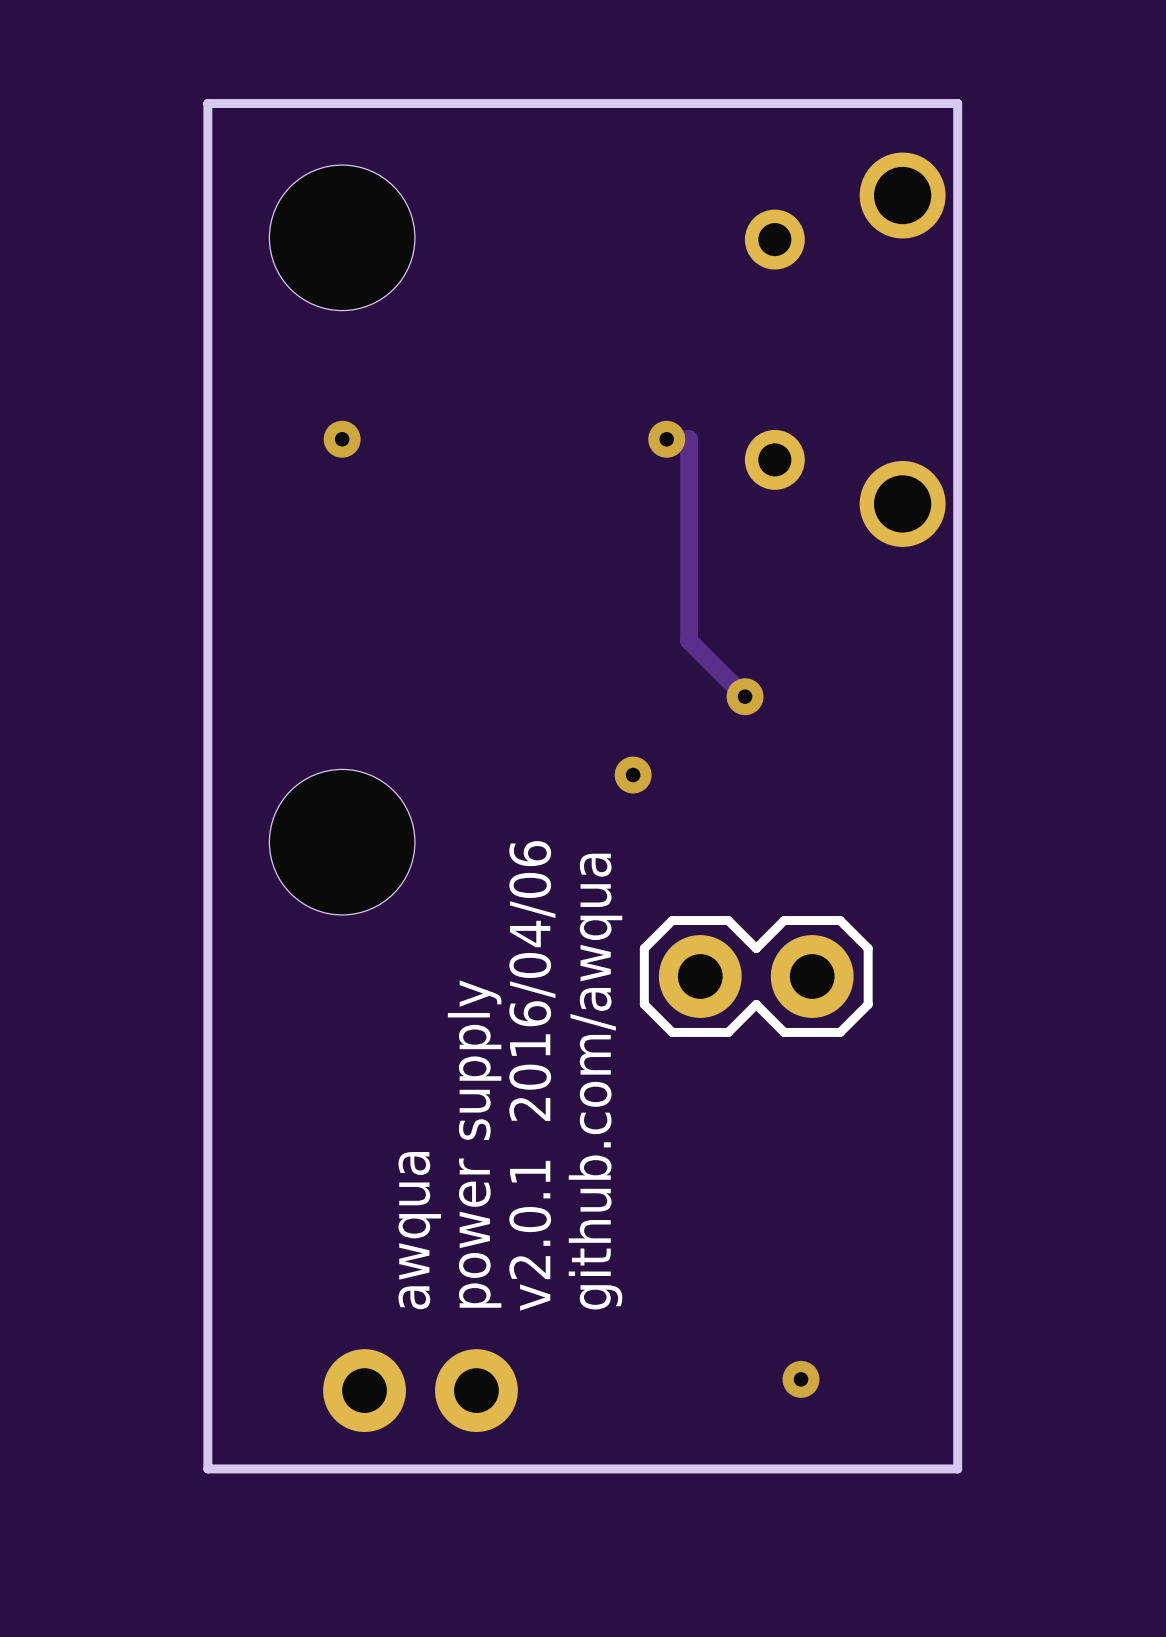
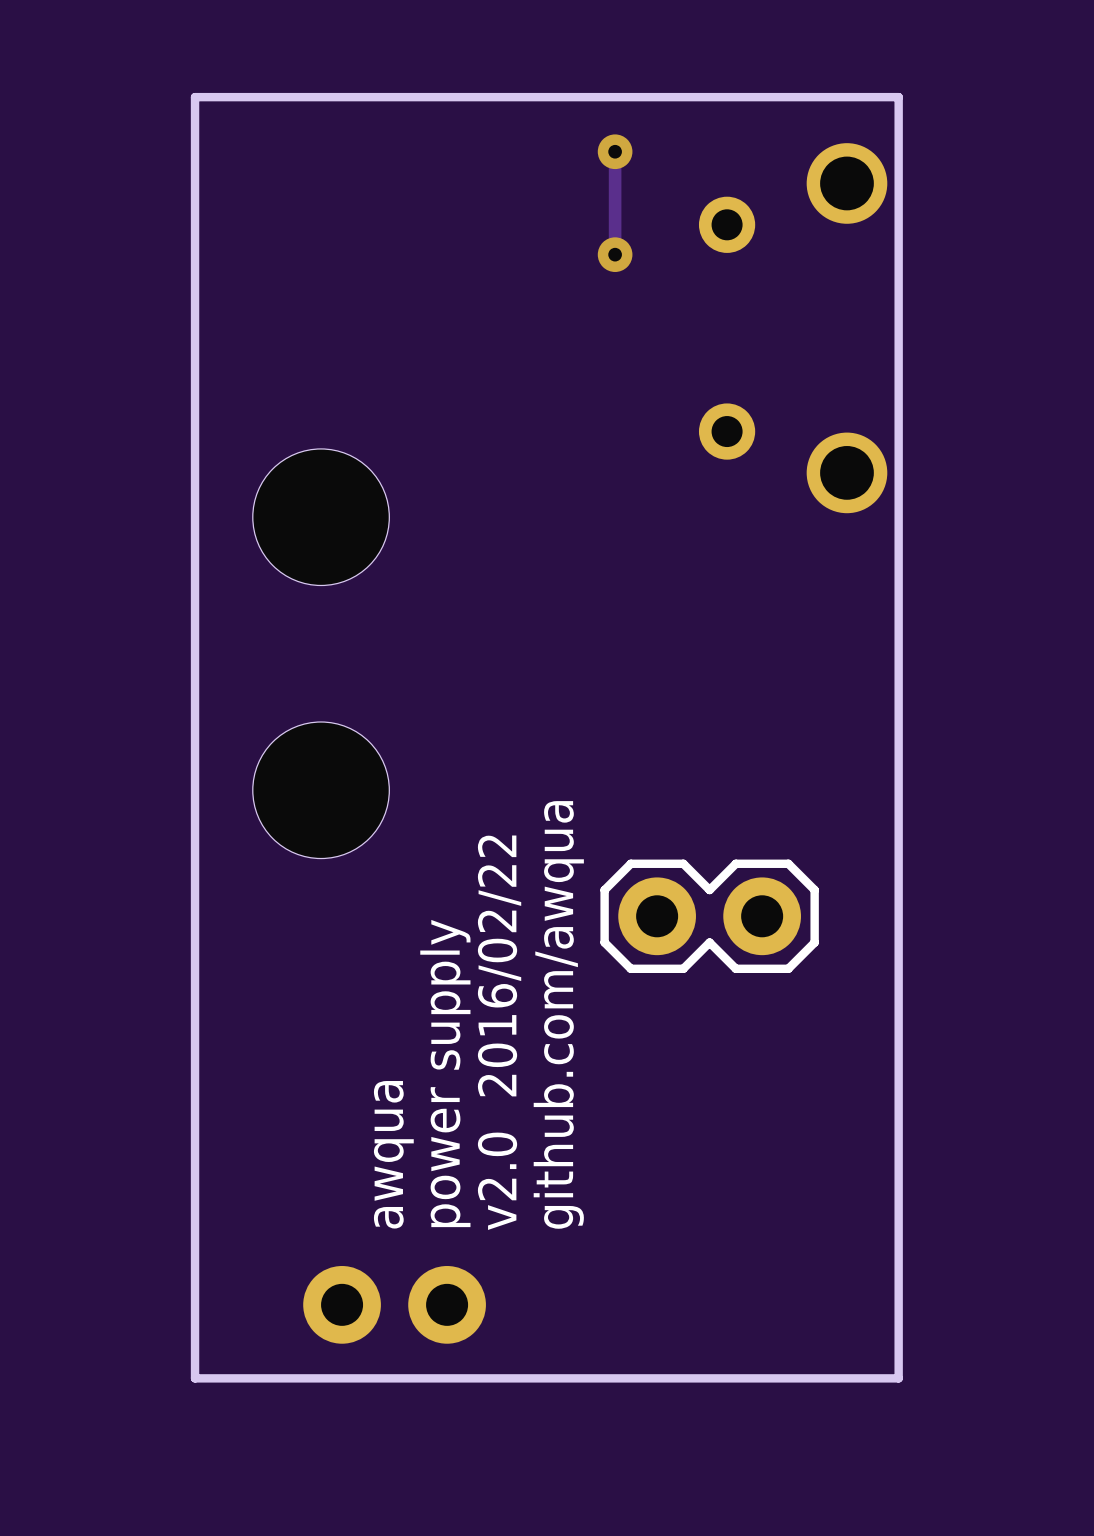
track: none -> (615, 151) (615, 254)
via: none -> (615, 151)
part position: (342, 237) -> (321, 517)
via: none -> (615, 254)
via: (342, 439) -> none
track: (666, 439) (689, 439) (689, 640) (745, 696) -> none
via: (666, 439) -> none
via: (745, 696) -> none
via: (633, 775) -> none
text: v2.0.1 2016/04/06 (532, 1075) -> v2.0 2016/02/22 (499, 1032)
via: (801, 1379) -> none

